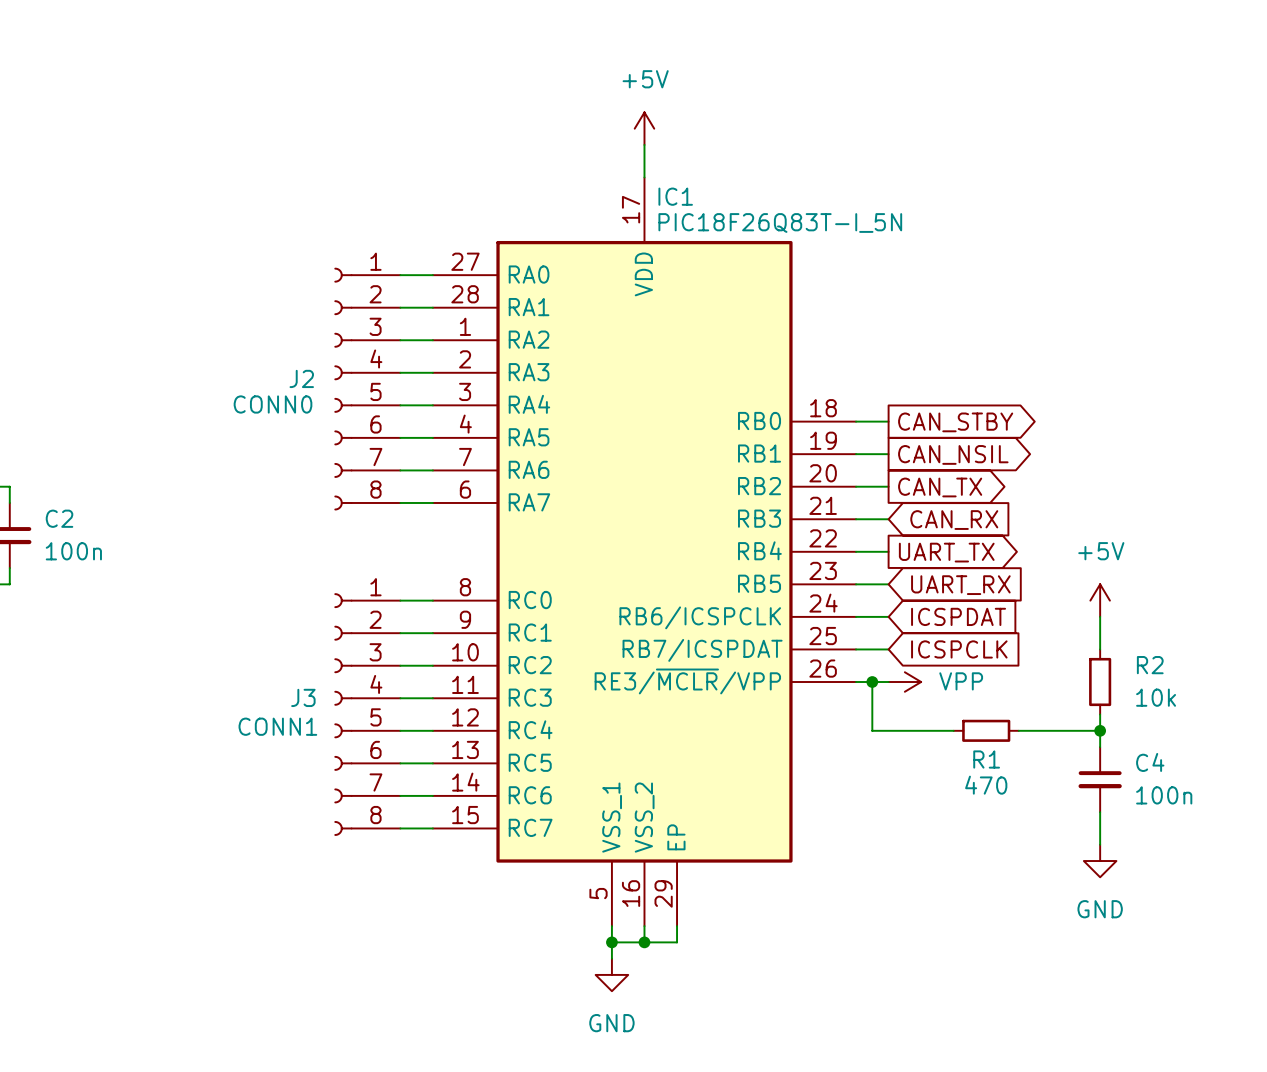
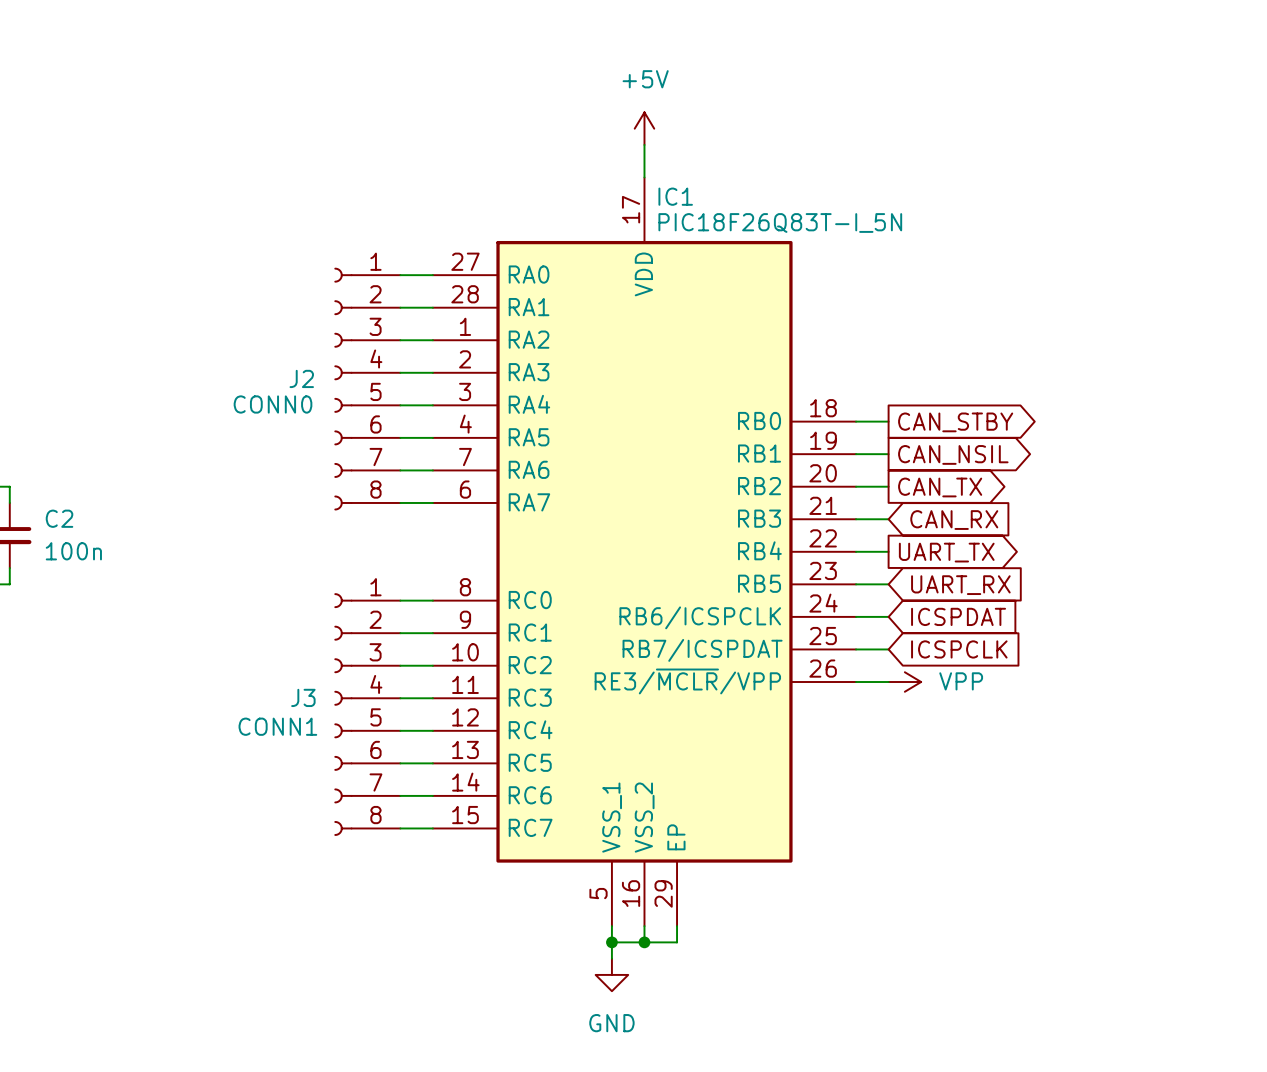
power symbol: +5V (1100, 600) -> none
wire: (1100, 616) (1100, 649) -> none
wire: (872, 682) (872, 730) (953, 730) -> none
junction: (872, 682) -> none
R2: 10k (1100, 682) -> none
wire: (1100, 714) (1100, 747) -> none
R1: 470 (986, 730) -> none
wire: (1018, 730) (1100, 730) -> none
junction: (1100, 730) -> none
C4: 100n (1100, 779) -> none
wire: (1100, 812) (1100, 844) -> none
power symbol: GND (1100, 861) -> none

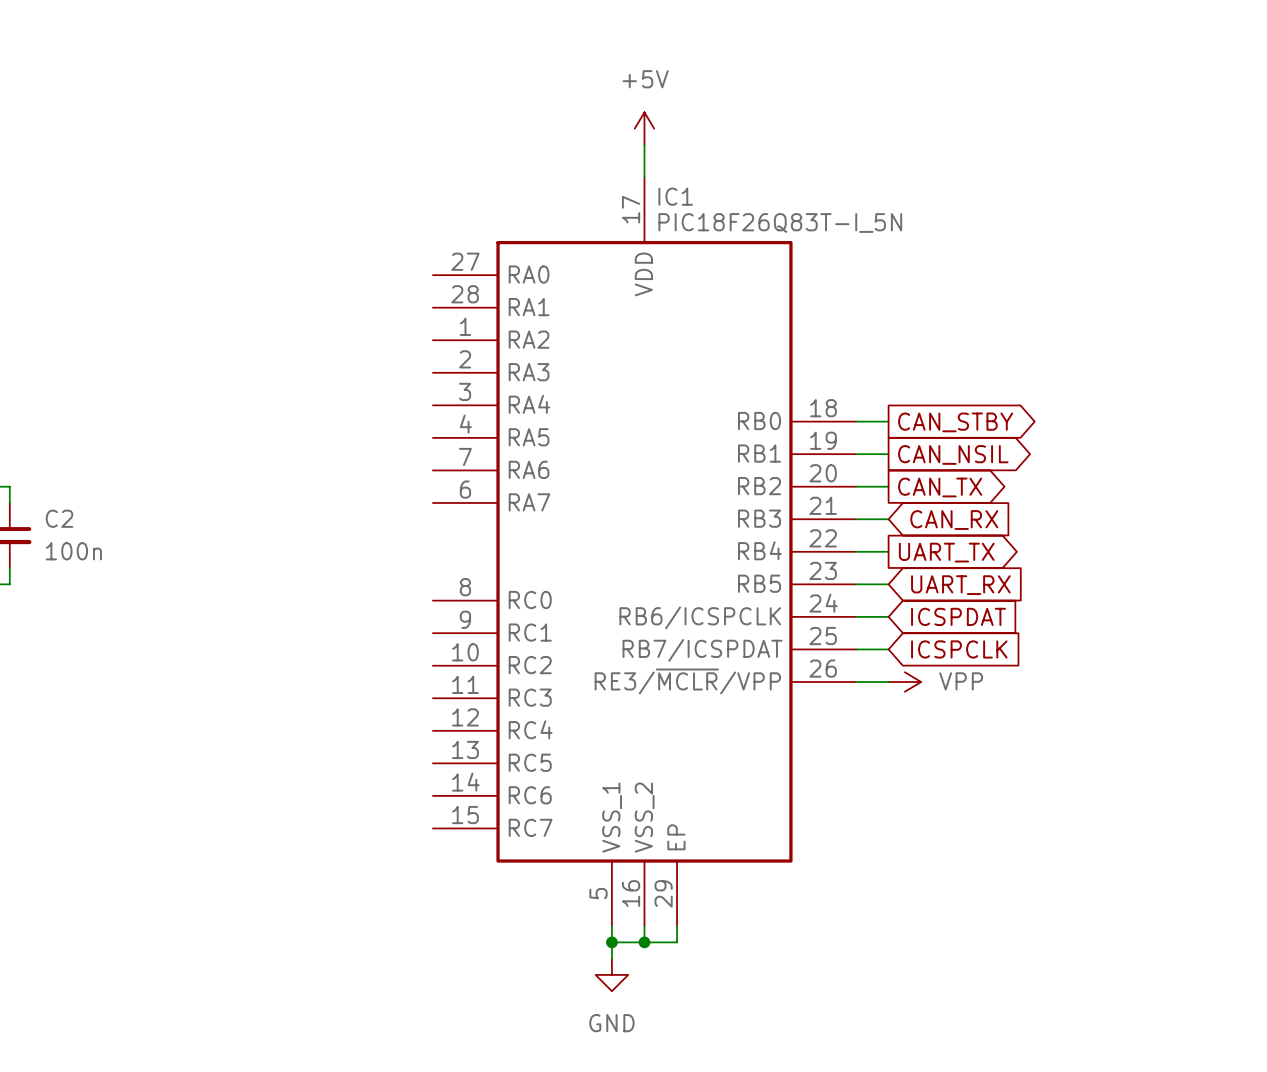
wire: (400, 275) (432, 275) -> none
wire: (400, 307) (432, 307) -> none
wire: (400, 340) (432, 340) -> none
wire: (400, 372) (432, 372) -> none
J2: CONN0 (367, 389) -> none
wire: (400, 405) (432, 405) -> none
wire: (400, 437) (432, 437) -> none
wire: (400, 470) (432, 470) -> none
wire: (400, 502) (432, 502) -> none
wire: (400, 600) (432, 600) -> none
wire: (400, 633) (432, 633) -> none
wire: (400, 665) (432, 665) -> none
wire: (400, 698) (432, 698) -> none
J3: CONN1 (367, 714) -> none
wire: (400, 730) (432, 730) -> none
wire: (400, 763) (432, 763) -> none
wire: (400, 795) (432, 795) -> none
wire: (400, 828) (432, 828) -> none

